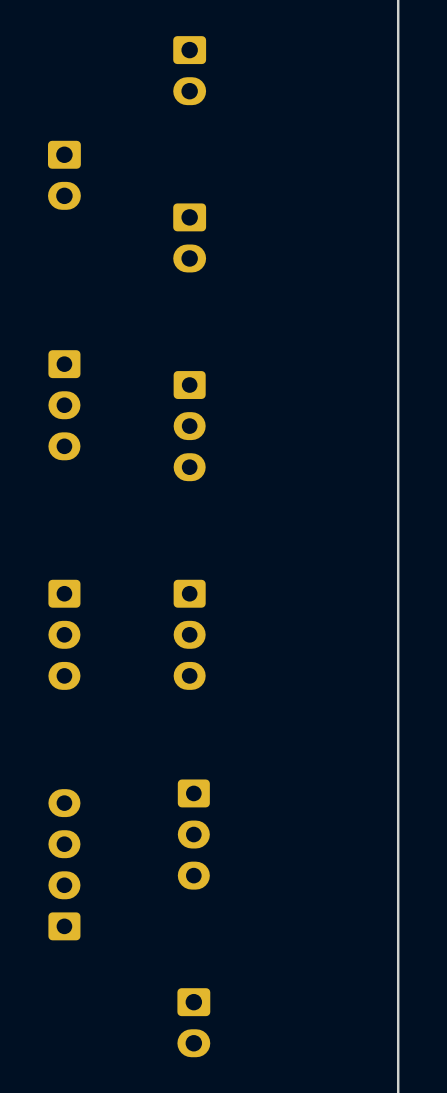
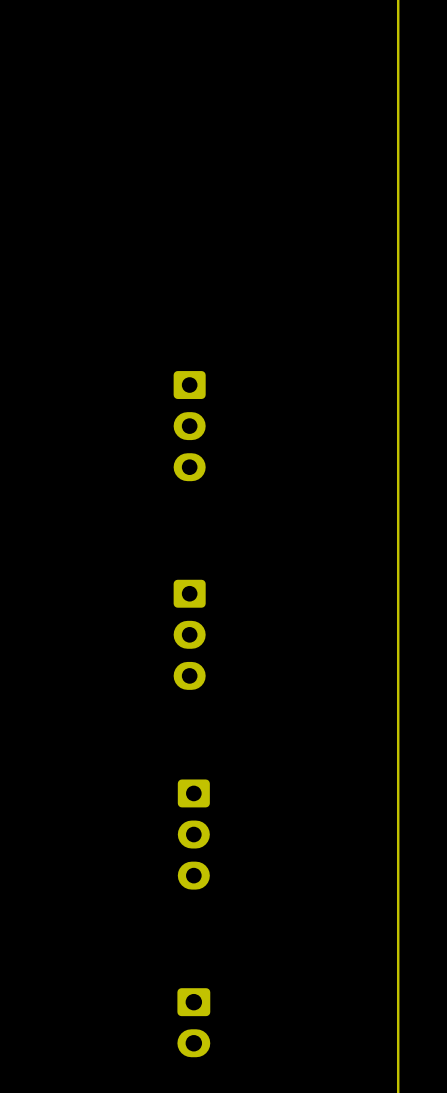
part: (189, 70) -> none
part: (64, 175) -> none
part: (189, 237) -> none
part: (64, 405) -> none
part: (64, 634) -> none
part: (64, 864) -> none

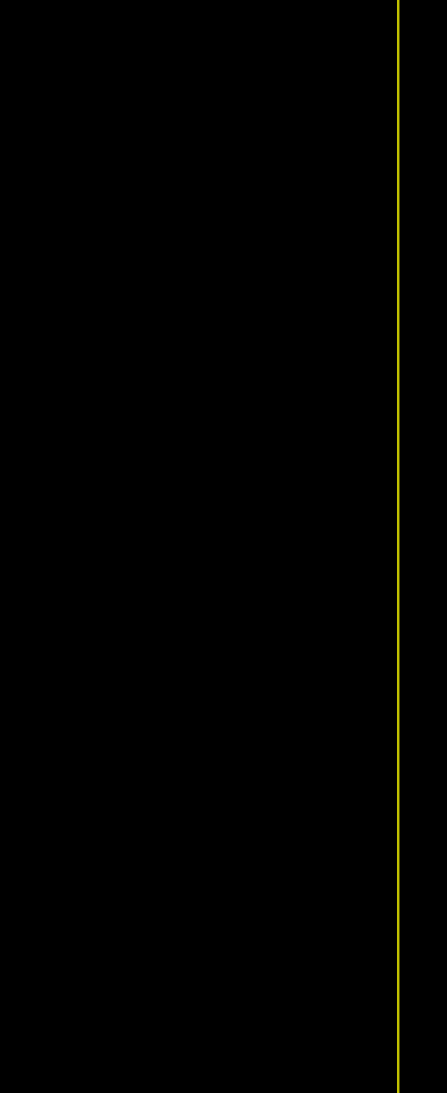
part: (189, 426) -> none
part: (189, 634) -> none
part: (193, 834) -> none
part: (193, 1022) -> none

